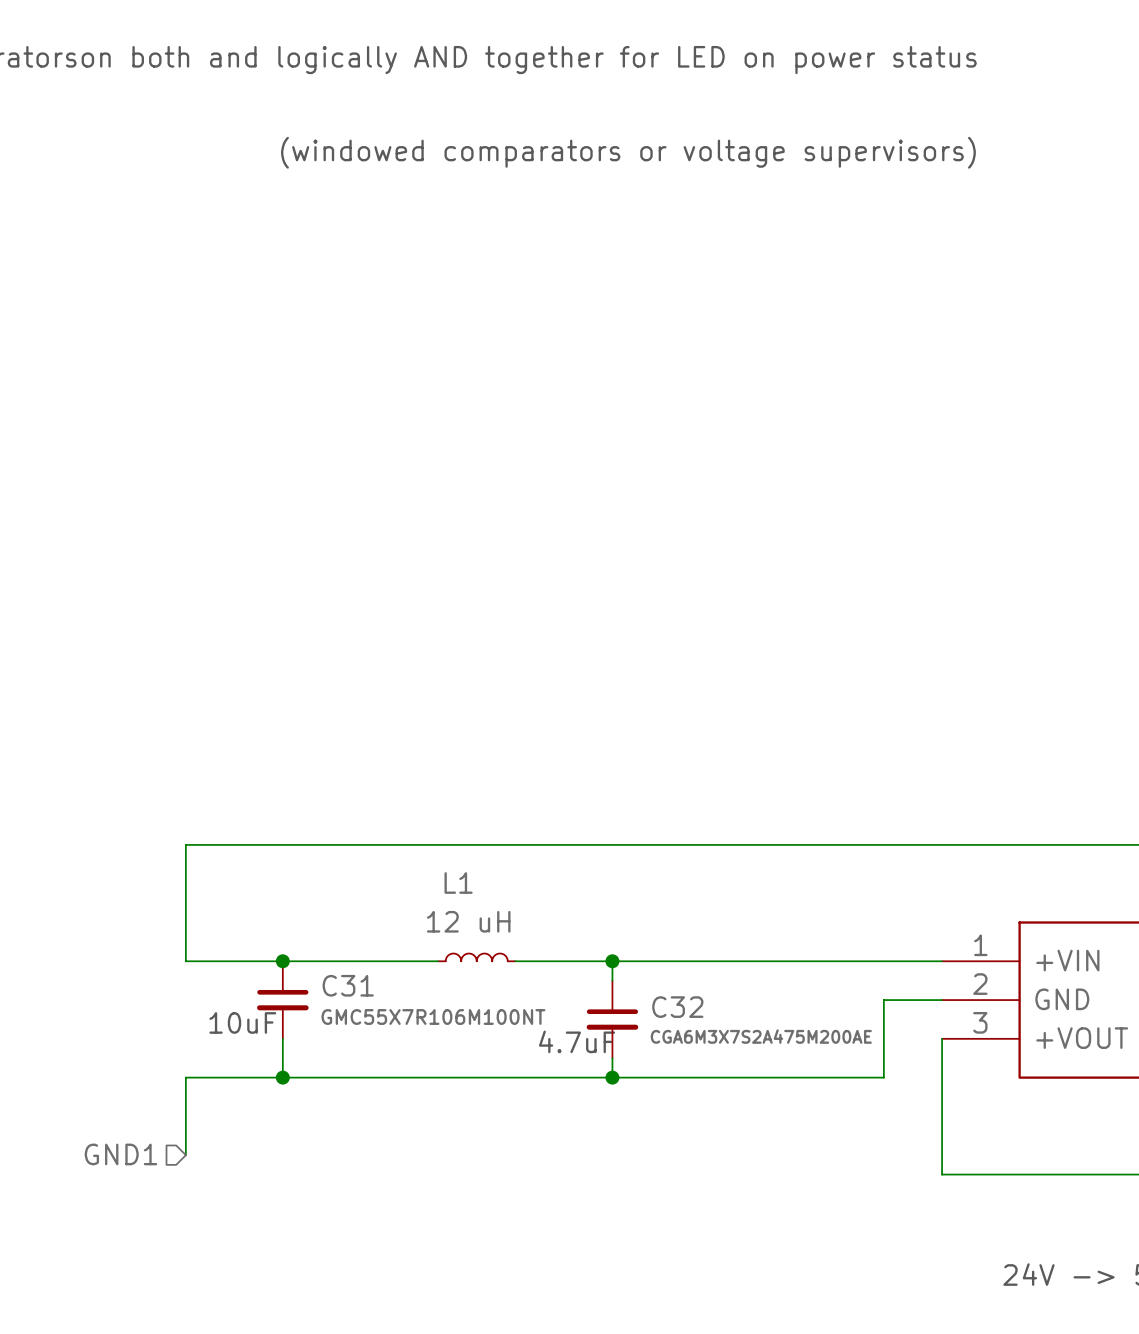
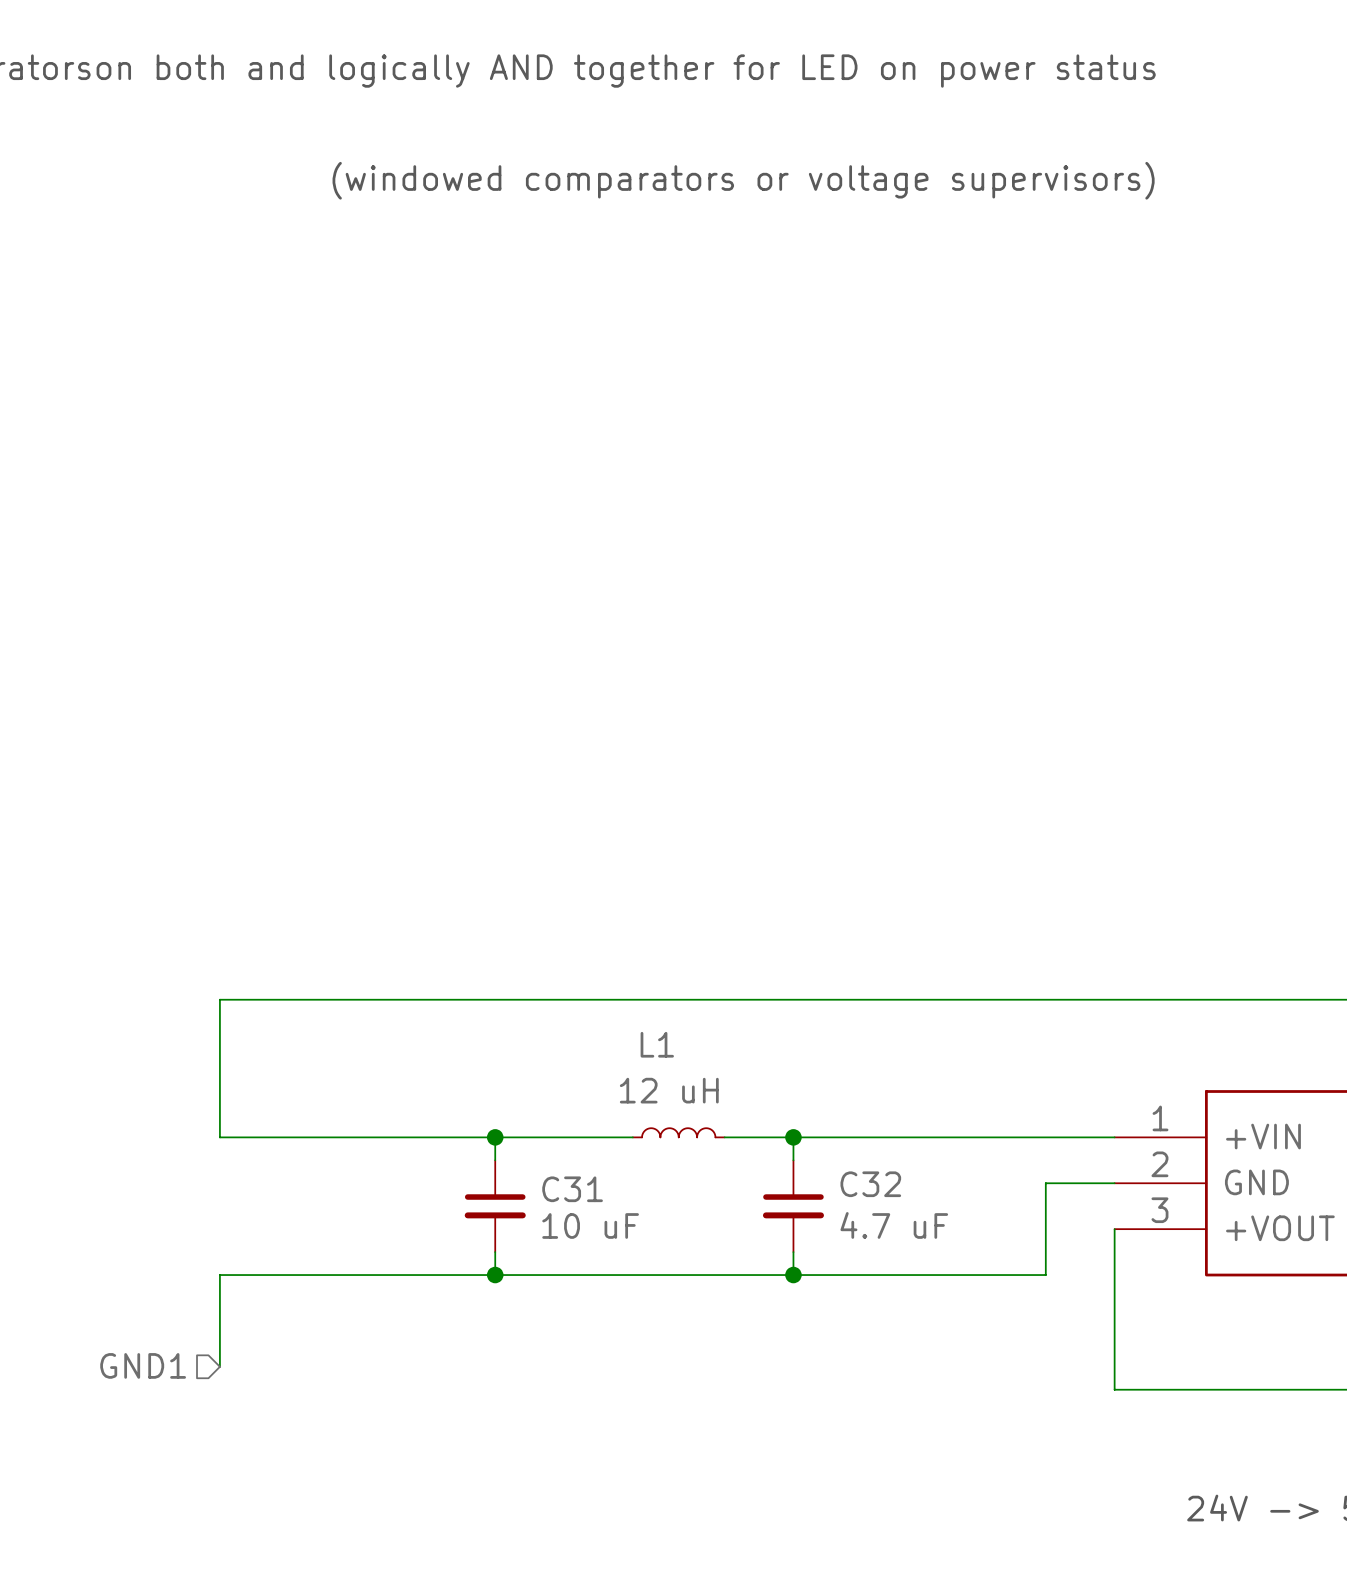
L1 position: (476, 957) -> (678, 1132)
junction: (282, 961) -> none
wire: none -> (495, 1137) (495, 1160)
junction: none -> (495, 1137)
wire: none -> (518, 1137) (609, 1137)
wire: (534, 961) (612, 961) (612, 980) -> none
junction position: (612, 961) -> (793, 1137)
wire: none -> (793, 1137) (793, 1160)
C31 position: (282, 1000) -> (495, 1206)
C32 name position: C32 (677, 1007) -> C32 (870, 1184)
C31 value: GMC55X7R106M100NT (433, 1017) -> 10 uF (590, 1225)
C32 position: (612, 1019) -> (793, 1206)
text: 10uF (242, 1022) -> none
C32 value: CGA6M3X7S2A475M200AE (761, 1036) -> 4.7 uF (894, 1225)
wire: (282, 1038) (282, 1077) -> none
text: 4.7uF (577, 1041) -> none
wire: none -> (495, 1252) (495, 1275)
wire: (612, 1058) (612, 1077) -> (793, 1252) (793, 1275)
junction: (282, 1077) -> none
junction: none -> (495, 1275)
junction position: (612, 1077) -> (793, 1275)

